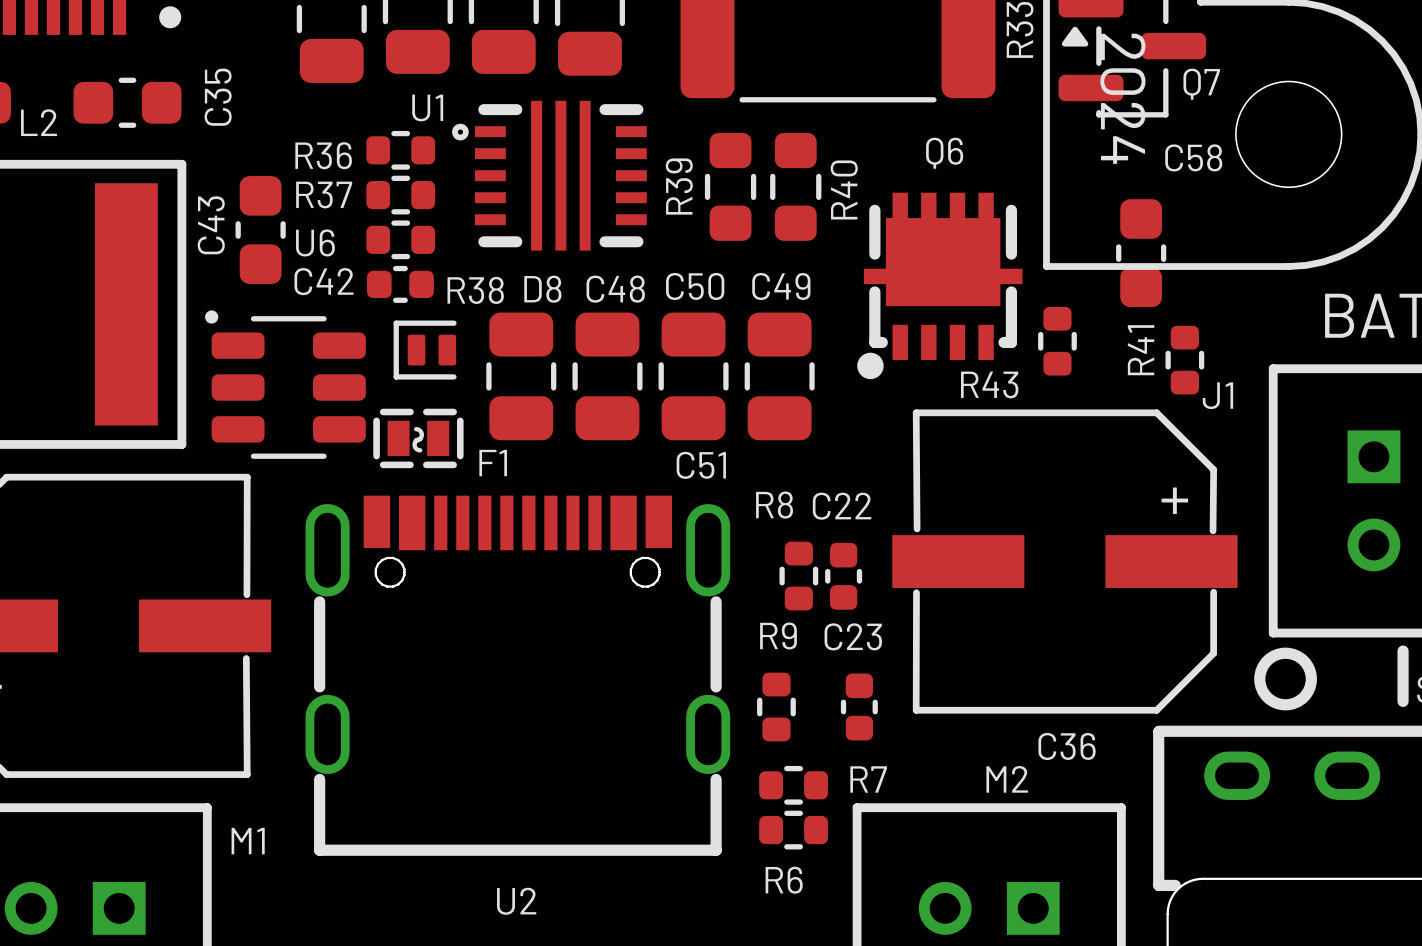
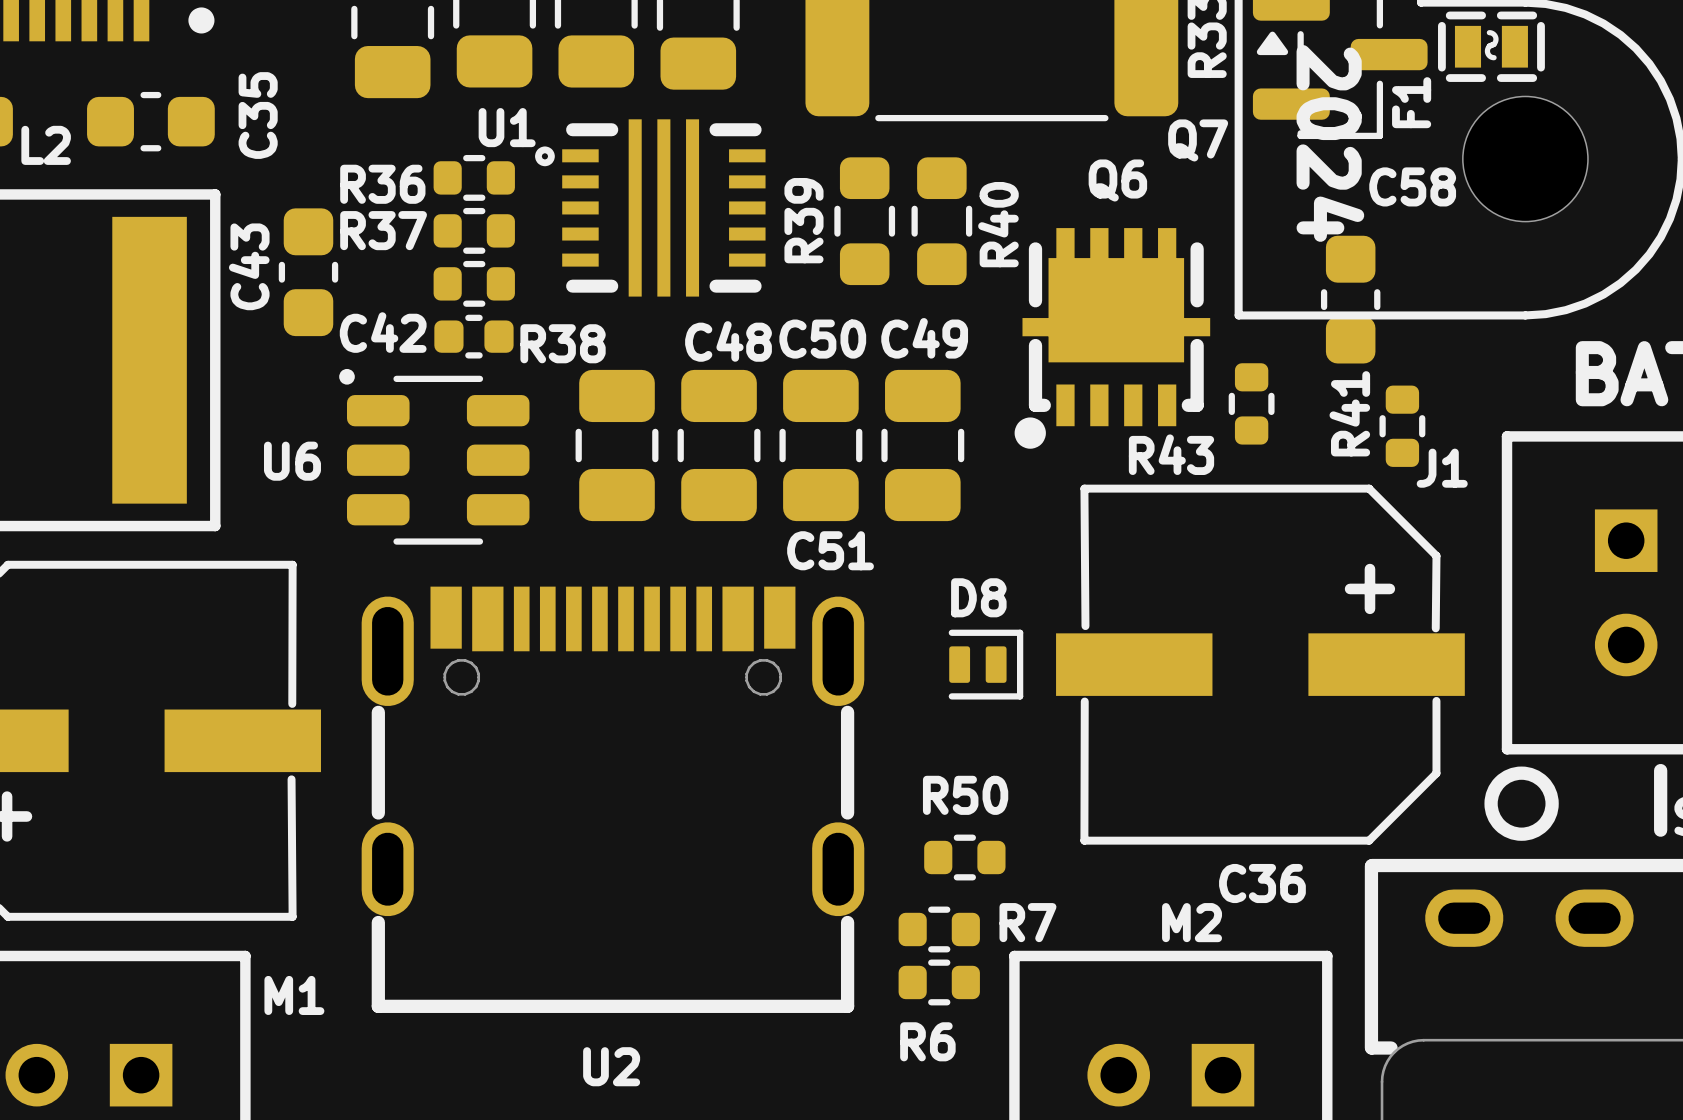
Q7 name position: Q7 (1201, 84) -> Q7 (1198, 140)
U6 name position: U6 (315, 242) -> U6 (292, 461)
D8 name position: D8 (542, 289) -> D8 (978, 597)
D8 rotation: 0° (425, 350) -> 180° (985, 664)
D8 position: (425, 350) -> (985, 664)
U6 position: (285, 384) -> (434, 456)
F1 rotation: 0° (418, 438) -> 180° (1491, 46)
F1 position: (418, 438) -> (1491, 46)
R8: (798, 576) -> none
C22: (843, 576) -> none
R9: (776, 706) -> none
C23: (859, 706) -> none
R50: none -> (964, 857)

